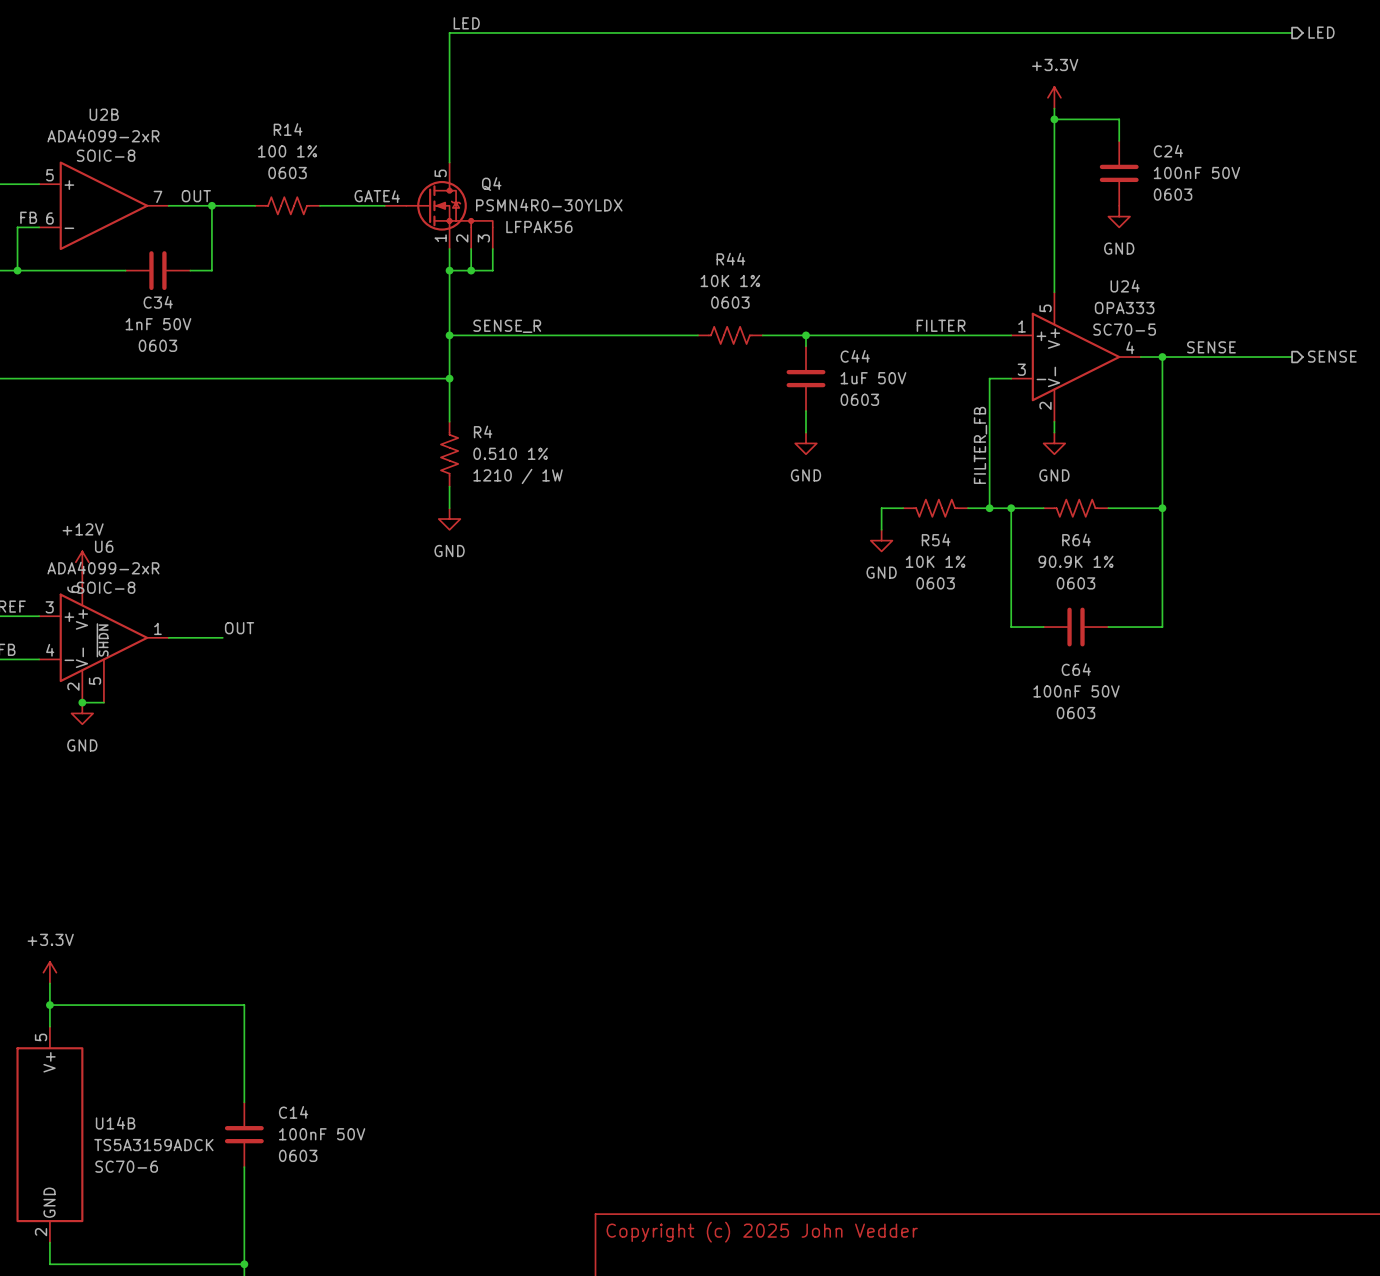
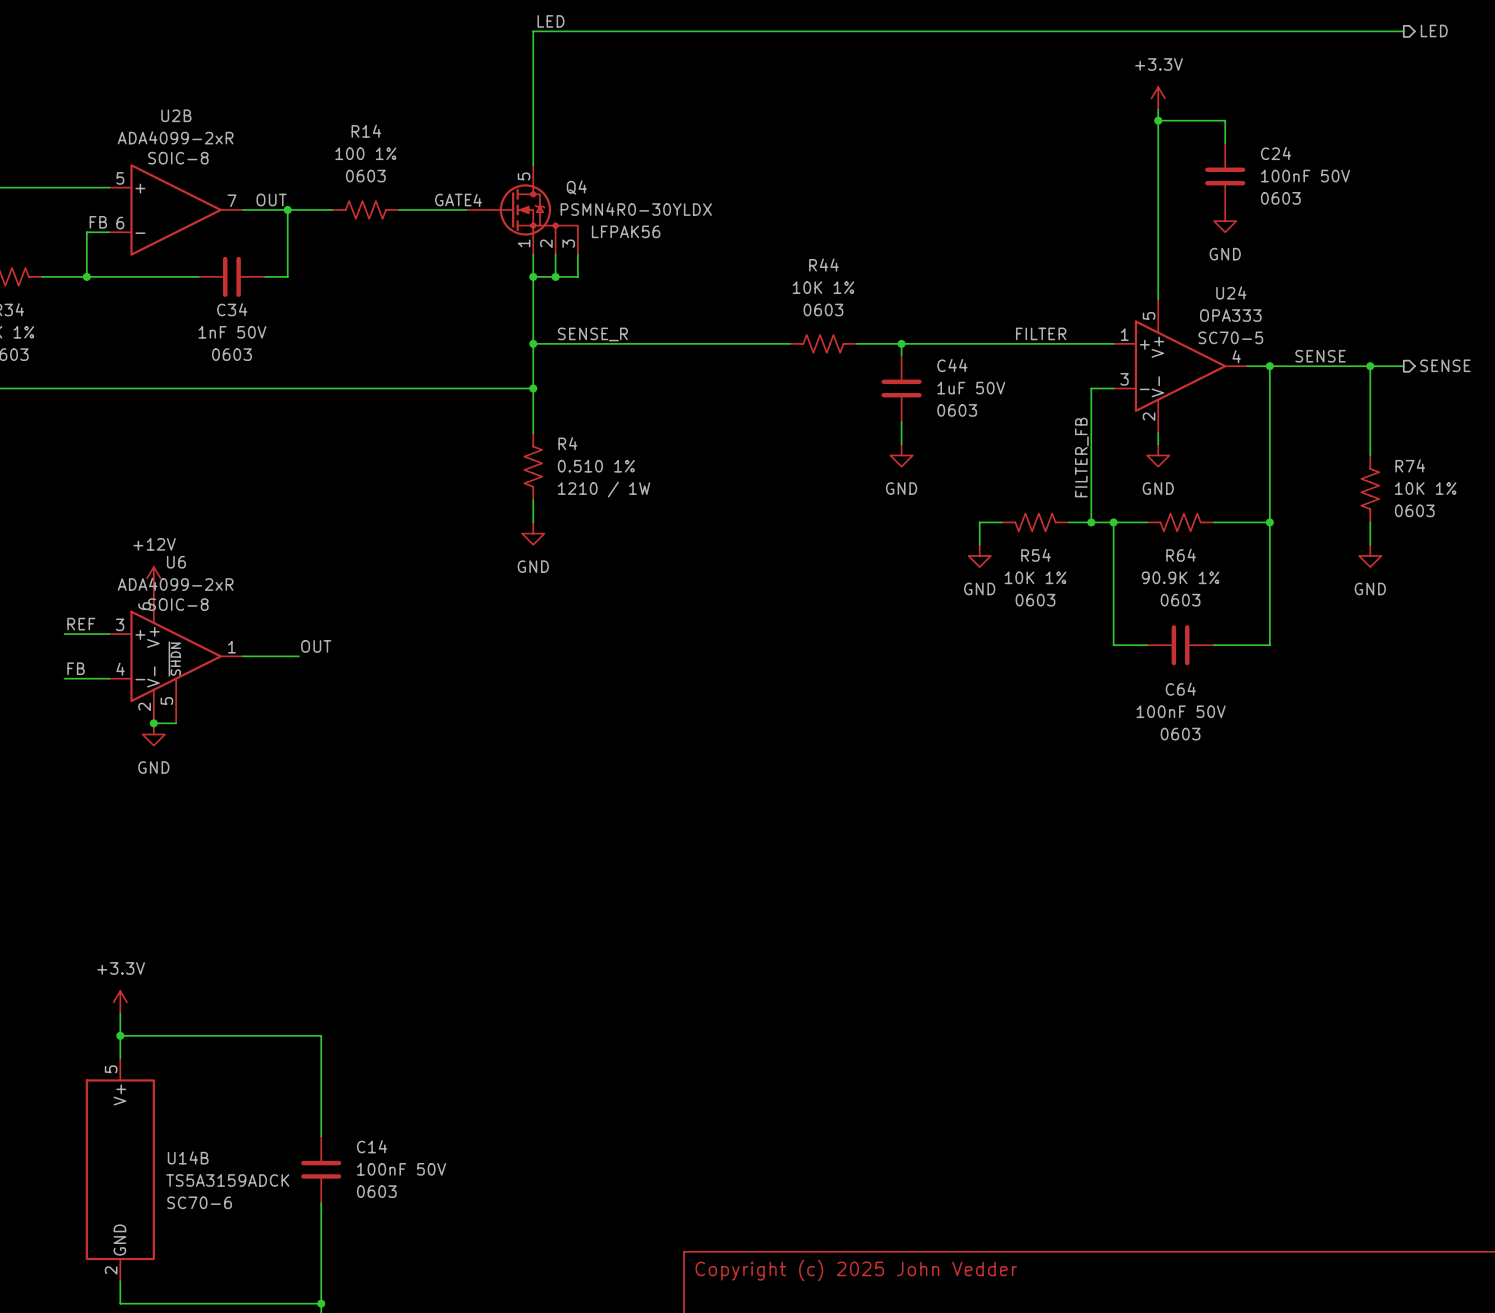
wire: none -> (1370, 366) (1370, 455)
junction: none -> (1370, 366)
R74: none -> 10K 1% (1370, 488)
wire: none -> (1370, 522) (1370, 544)
power symbol: none -> GND (1370, 555)

